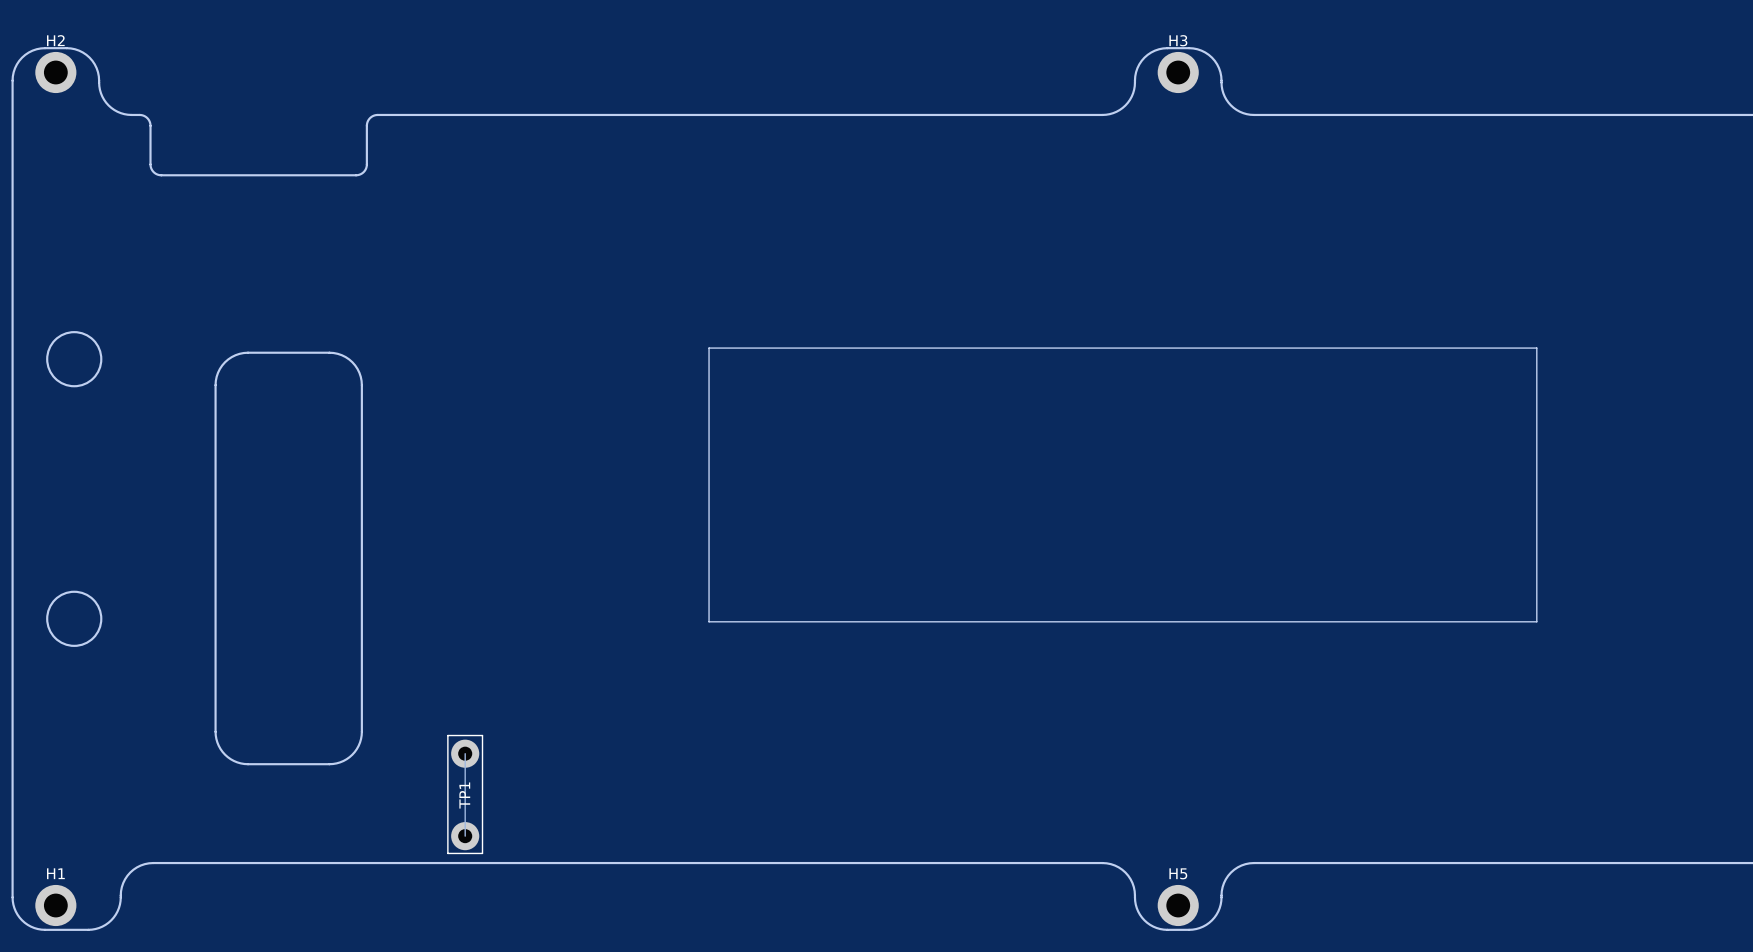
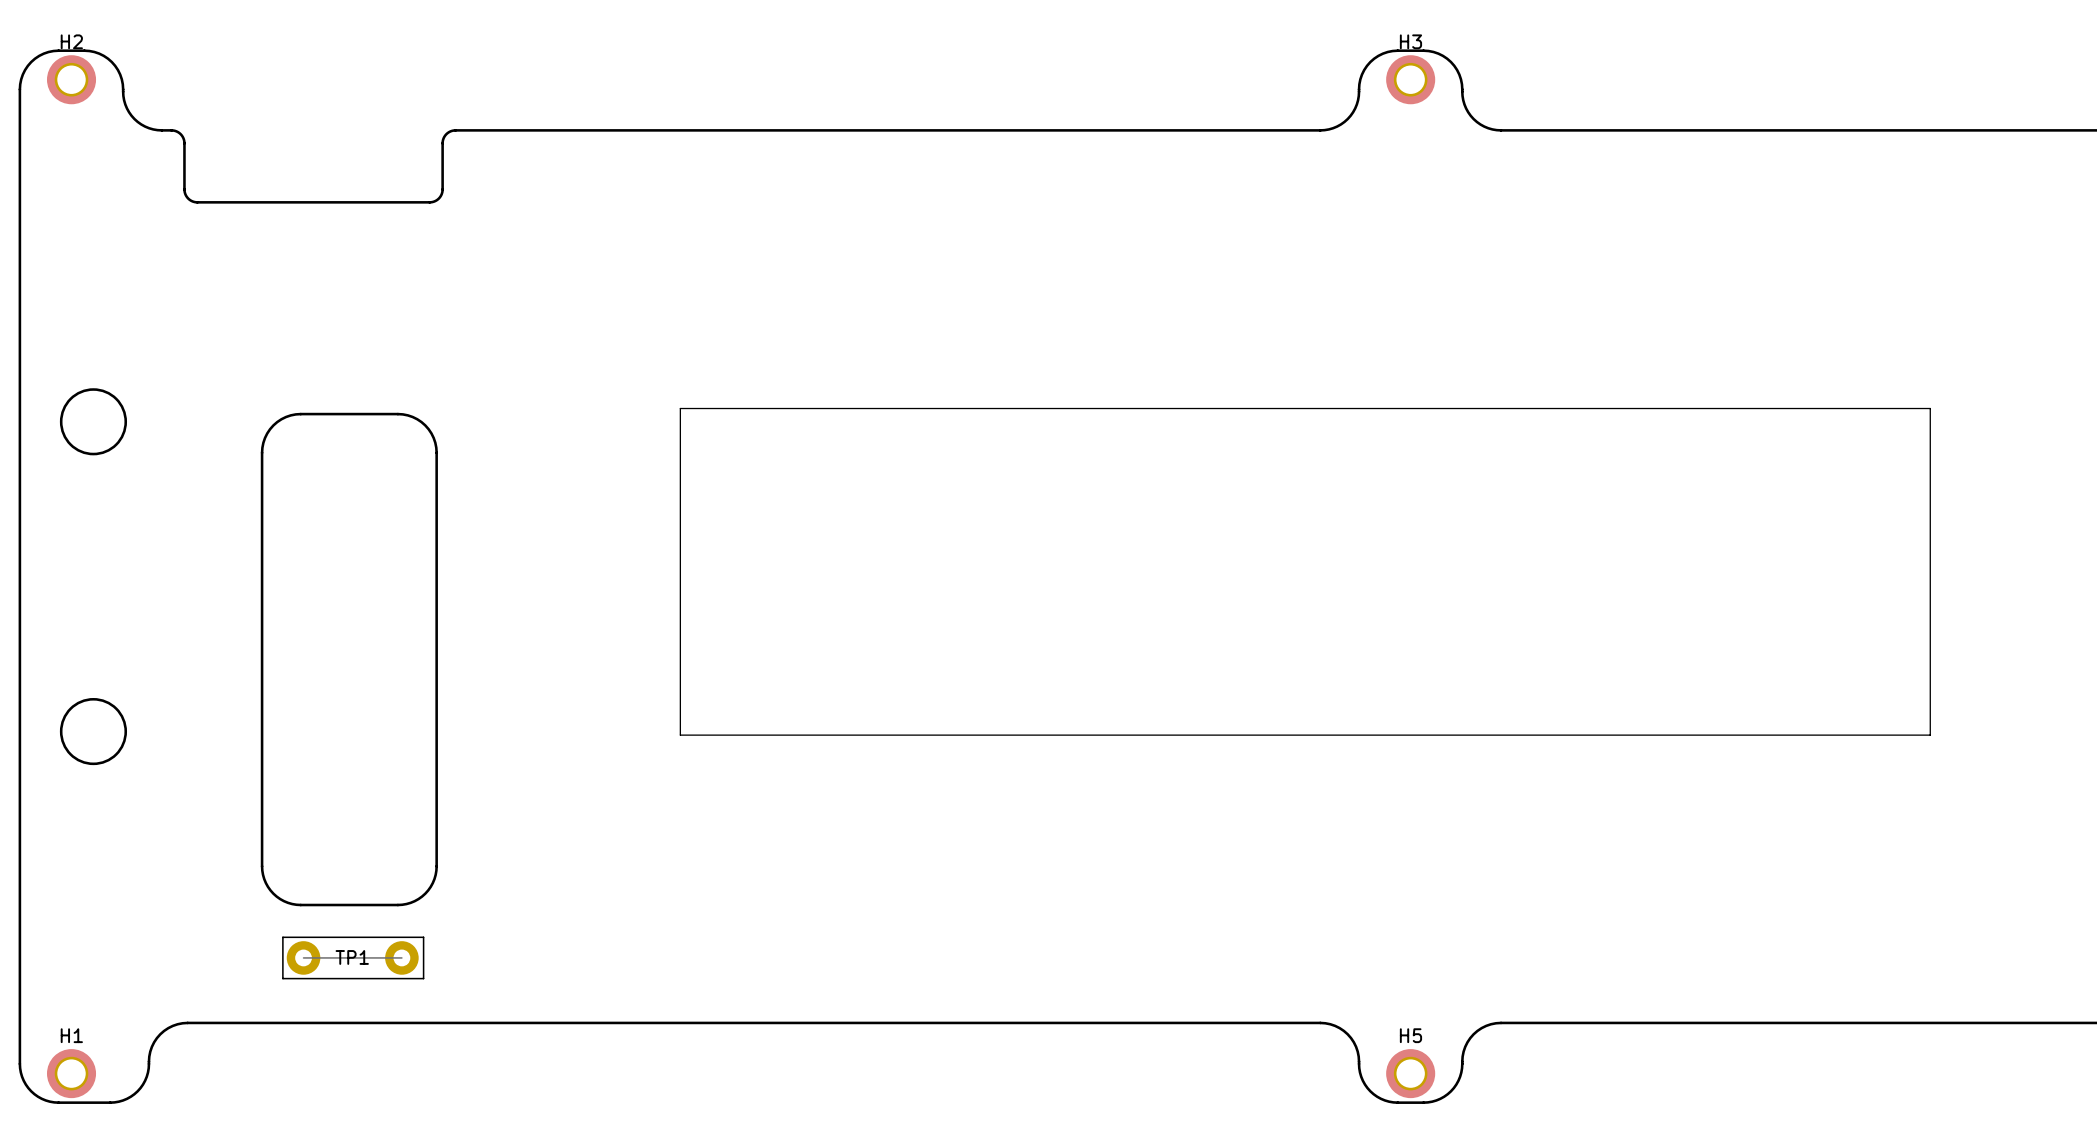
board edge: (709, 348) (709, 621) -> (850, 408) (680, 408) (680, 735) (850, 735)
board edge: (1536, 348) (1536, 621) -> (1838, 408) (1930, 408) (1930, 735) (1838, 735)
TP1 rotation: 0° (465, 794) -> 90° clockwise (353, 957)
TP1 position: (465, 794) -> (353, 957)

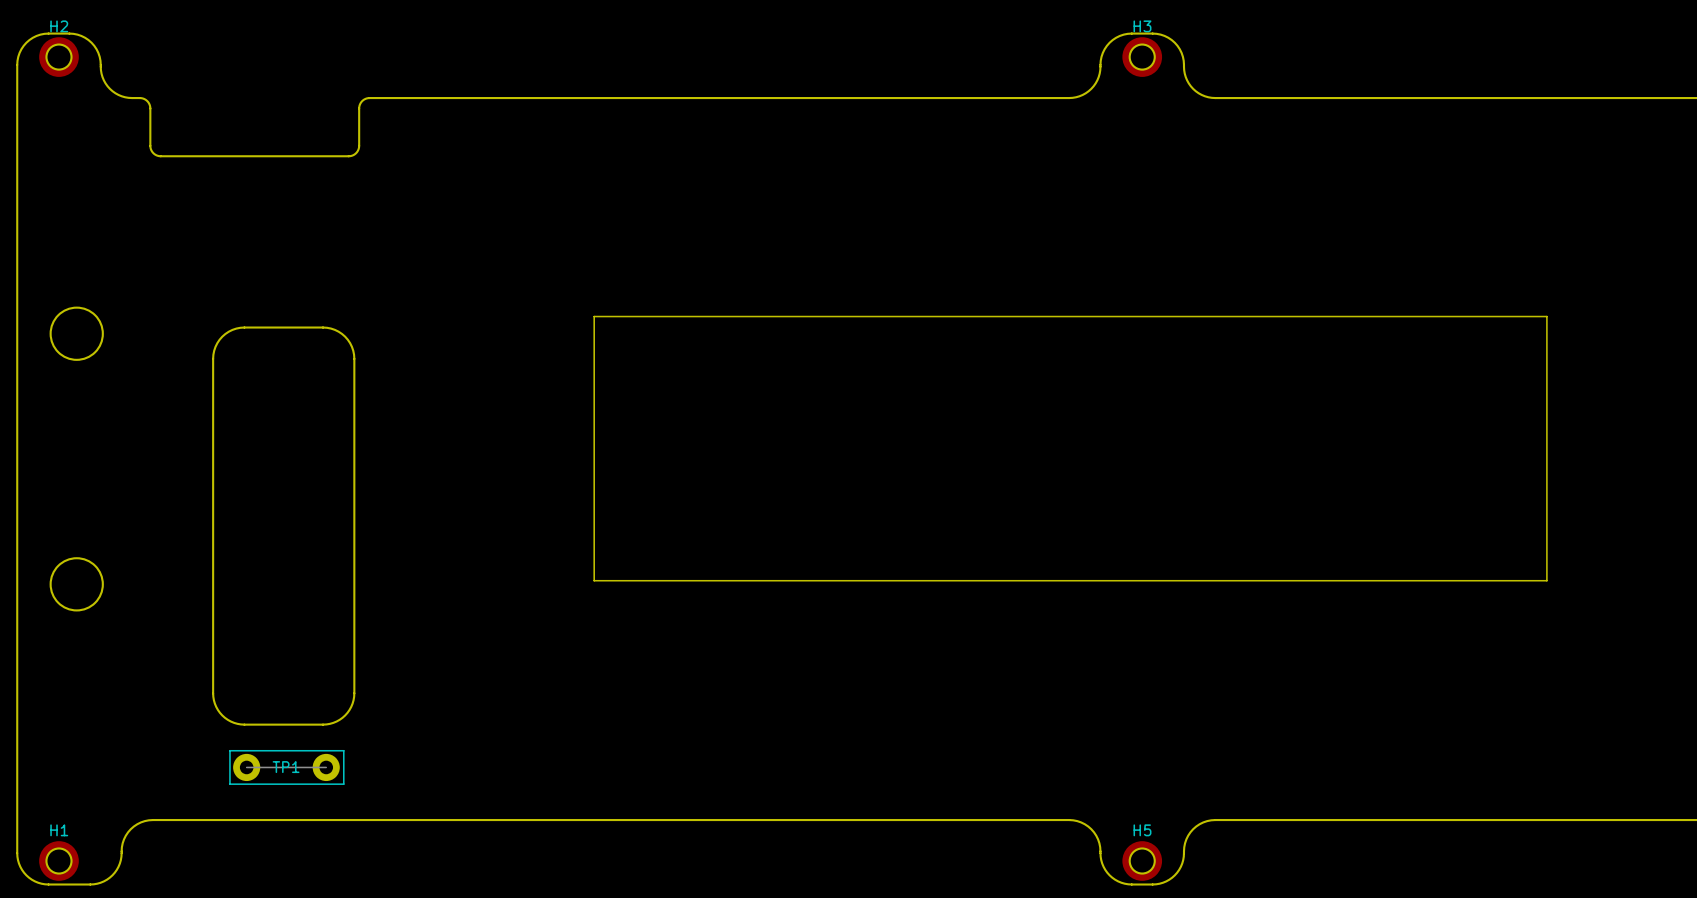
board edge: (680, 408) (1930, 408) (1930, 735) (680, 735) (680, 408) -> (594, 316) (594, 580) (1546, 580) (1546, 316) (594, 316)

